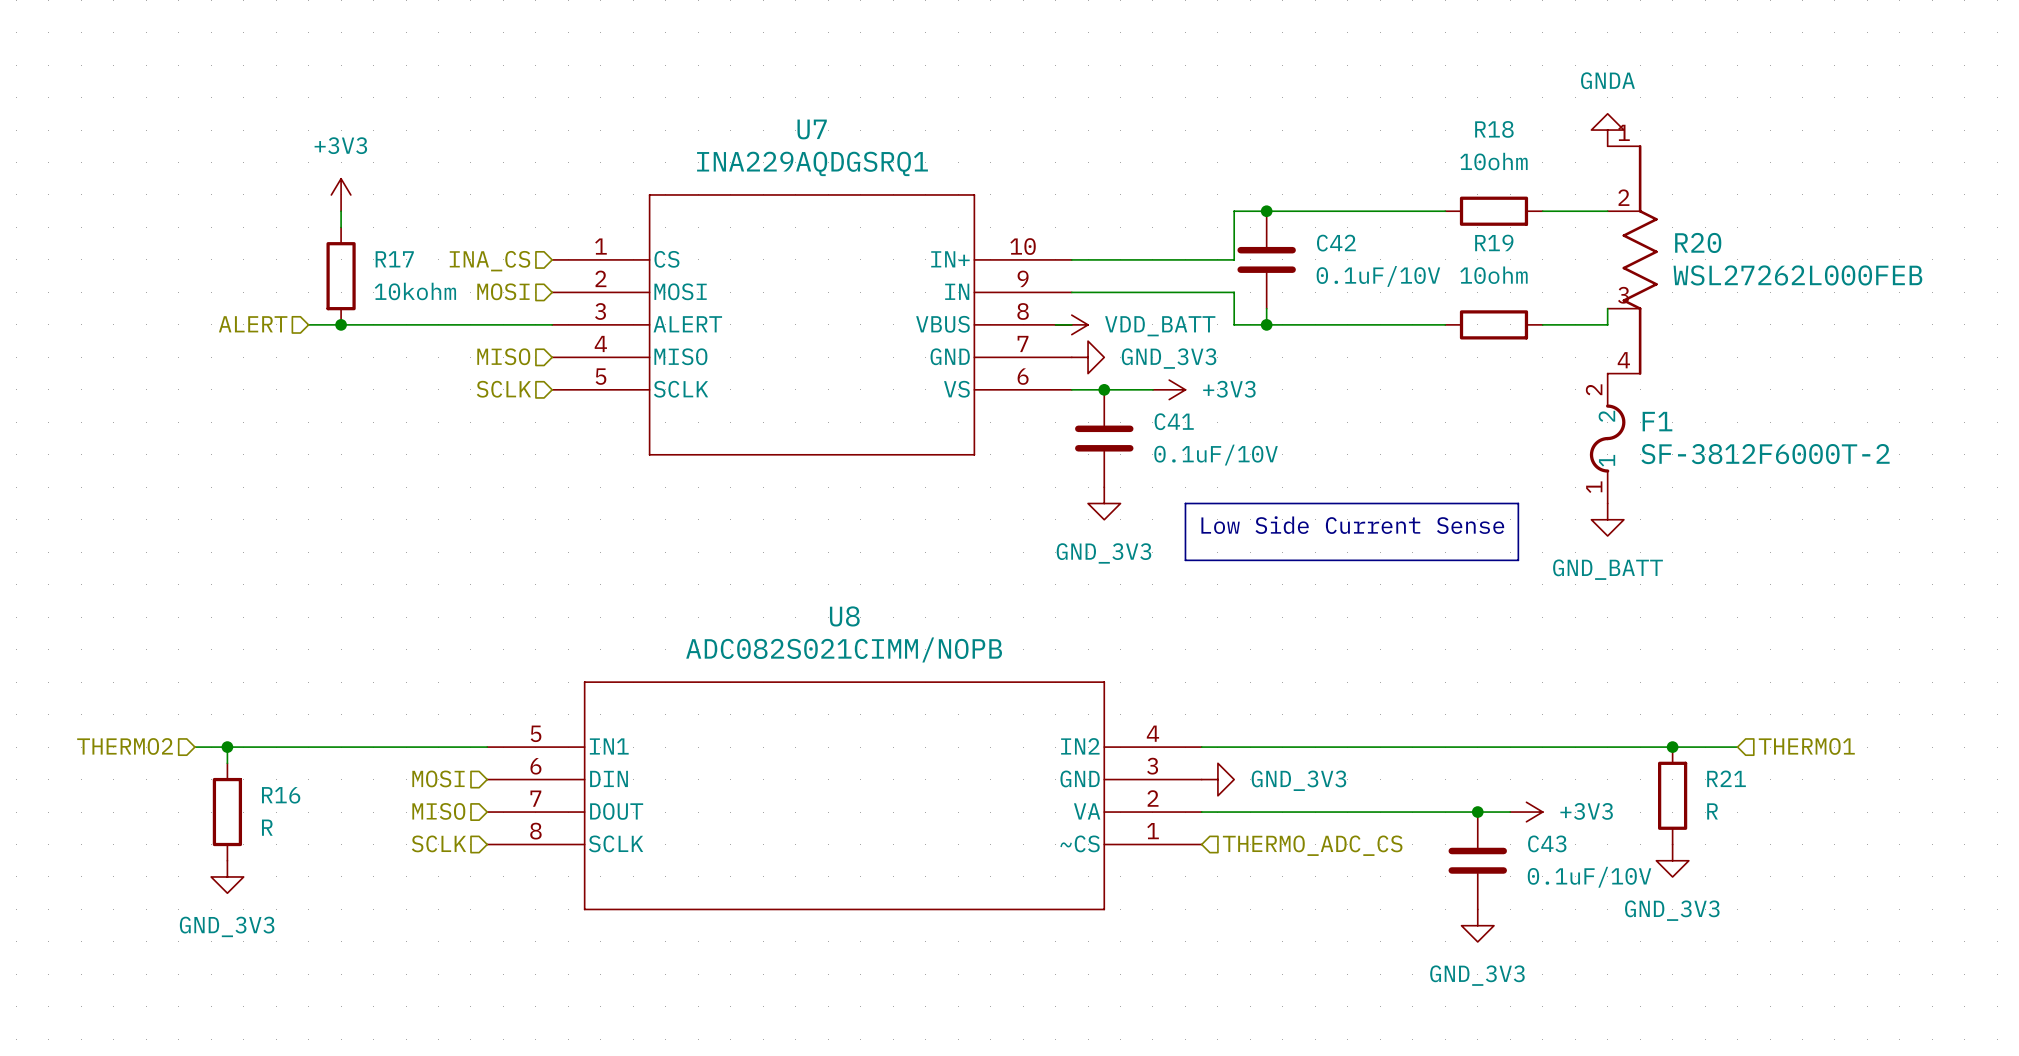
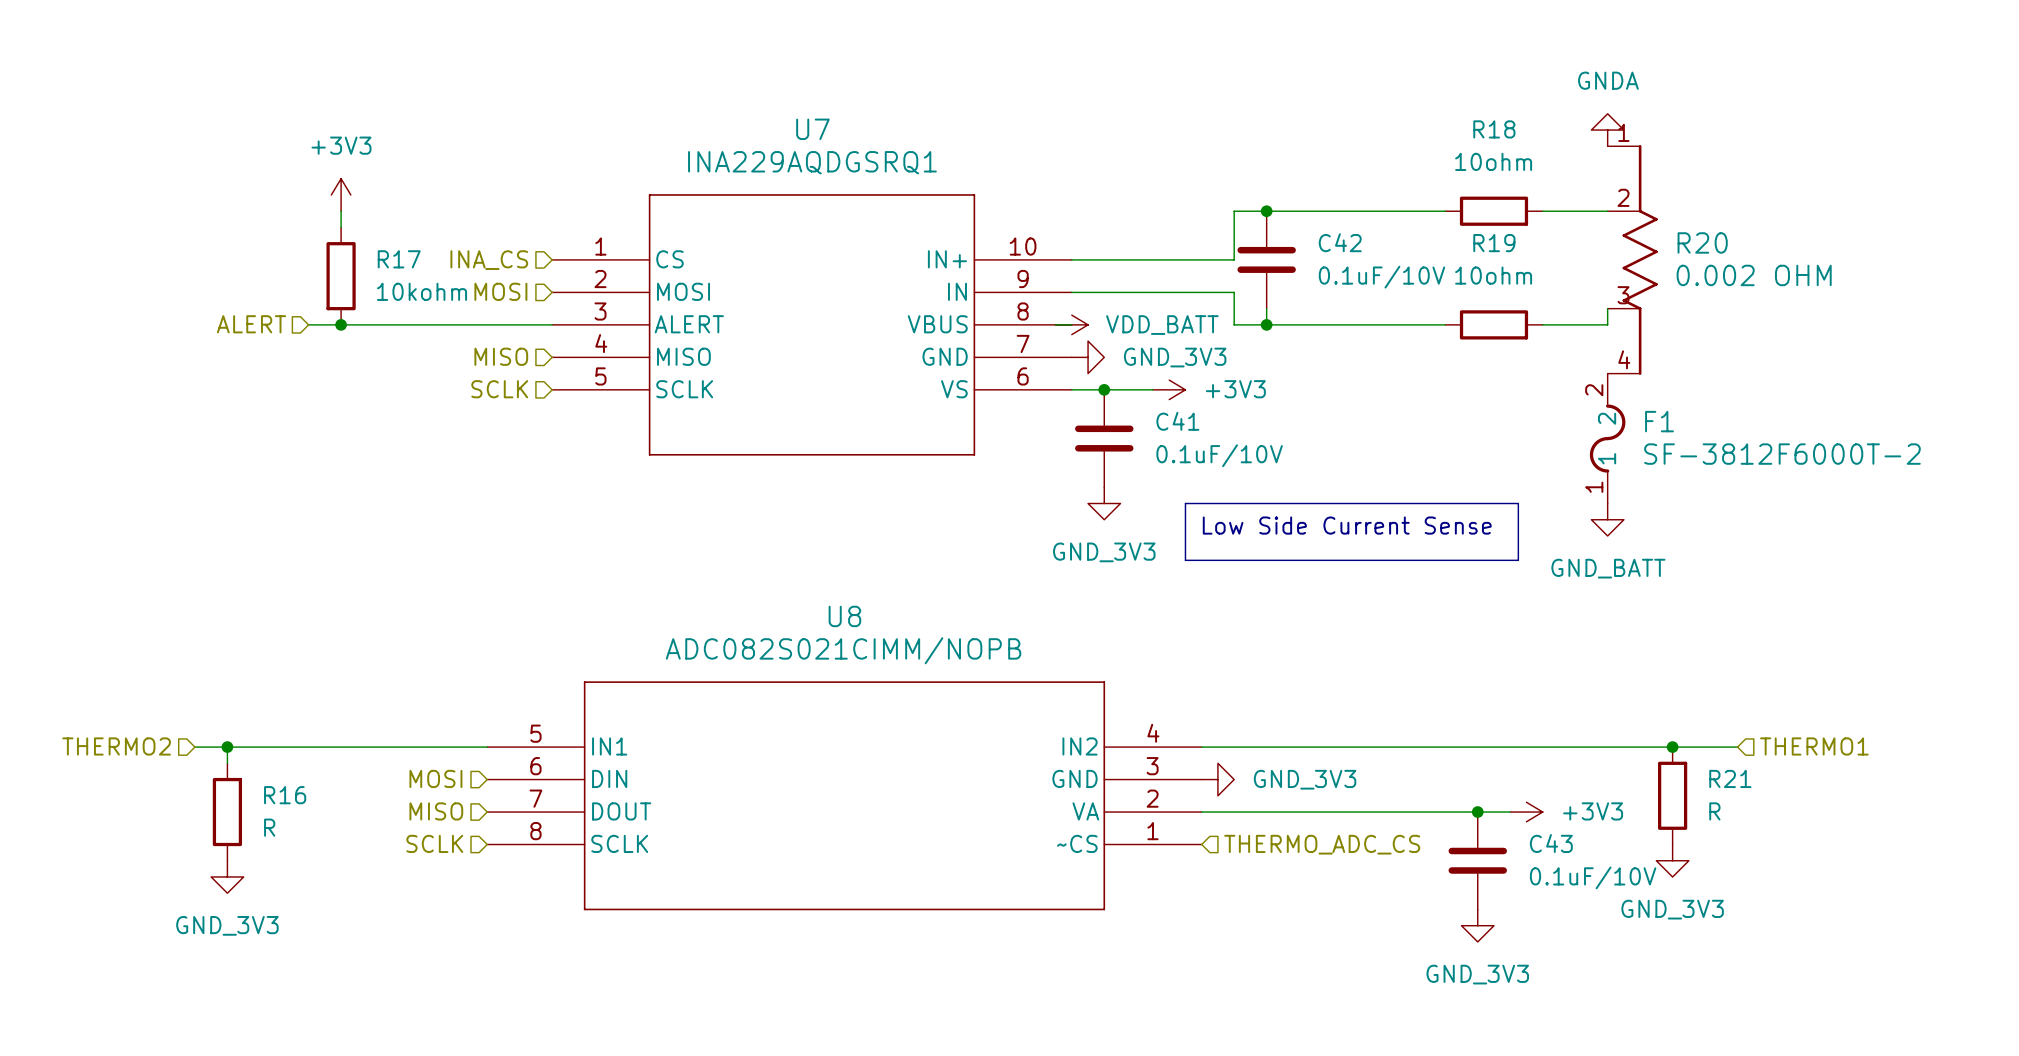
R20 value: WSL27262L000FEB (1797, 275) -> 0.002 OHM (1754, 275)

